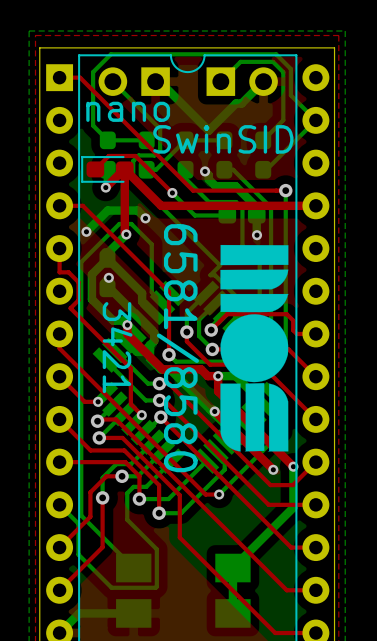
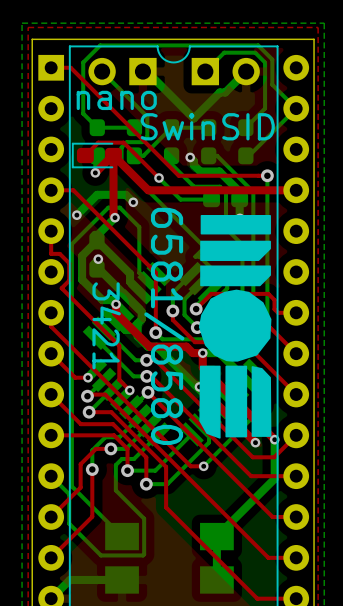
drawing: none -> [200, 214, 271, 287]
drawing shape: [220, 244, 289, 452] -> [198, 289, 272, 362]
drawing: none -> [199, 365, 272, 439]

